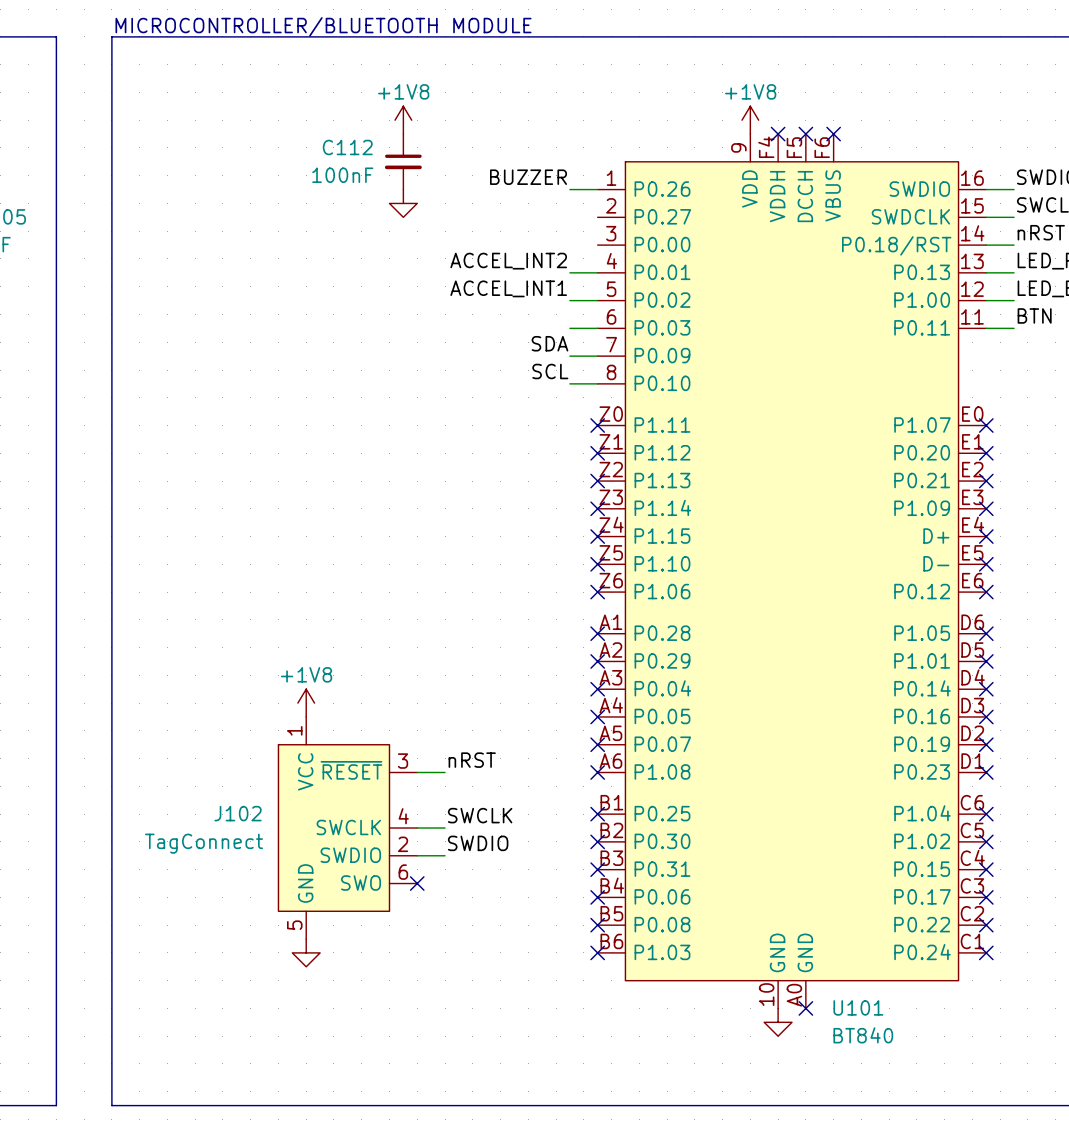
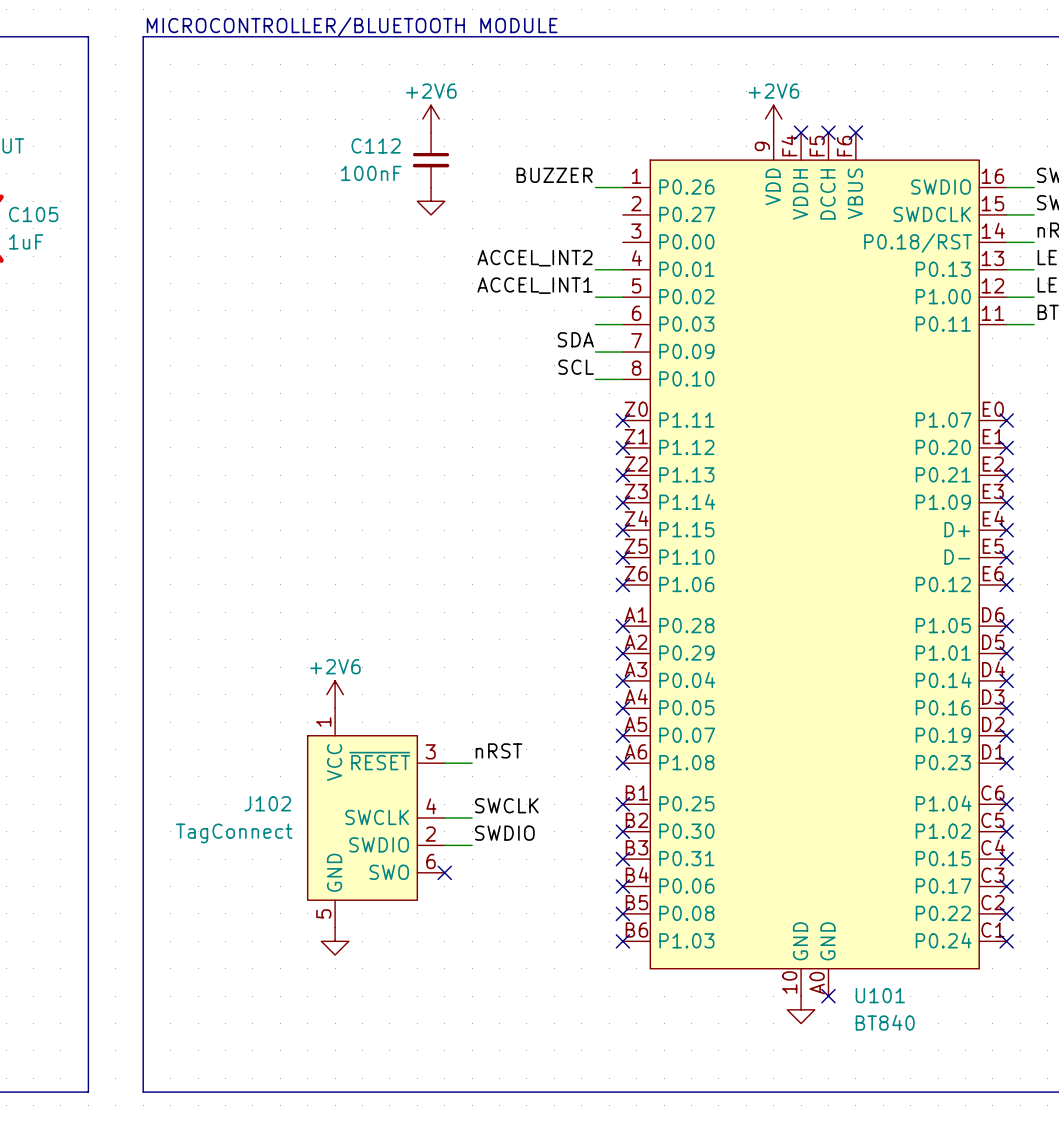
power symbol: +1V8 (403, 120) -> +2V6 (431, 119)
power symbol: +1V8 (750, 120) -> +2V6 (773, 119)
power symbol: +1V8 (306, 703) -> +2V6 (335, 694)

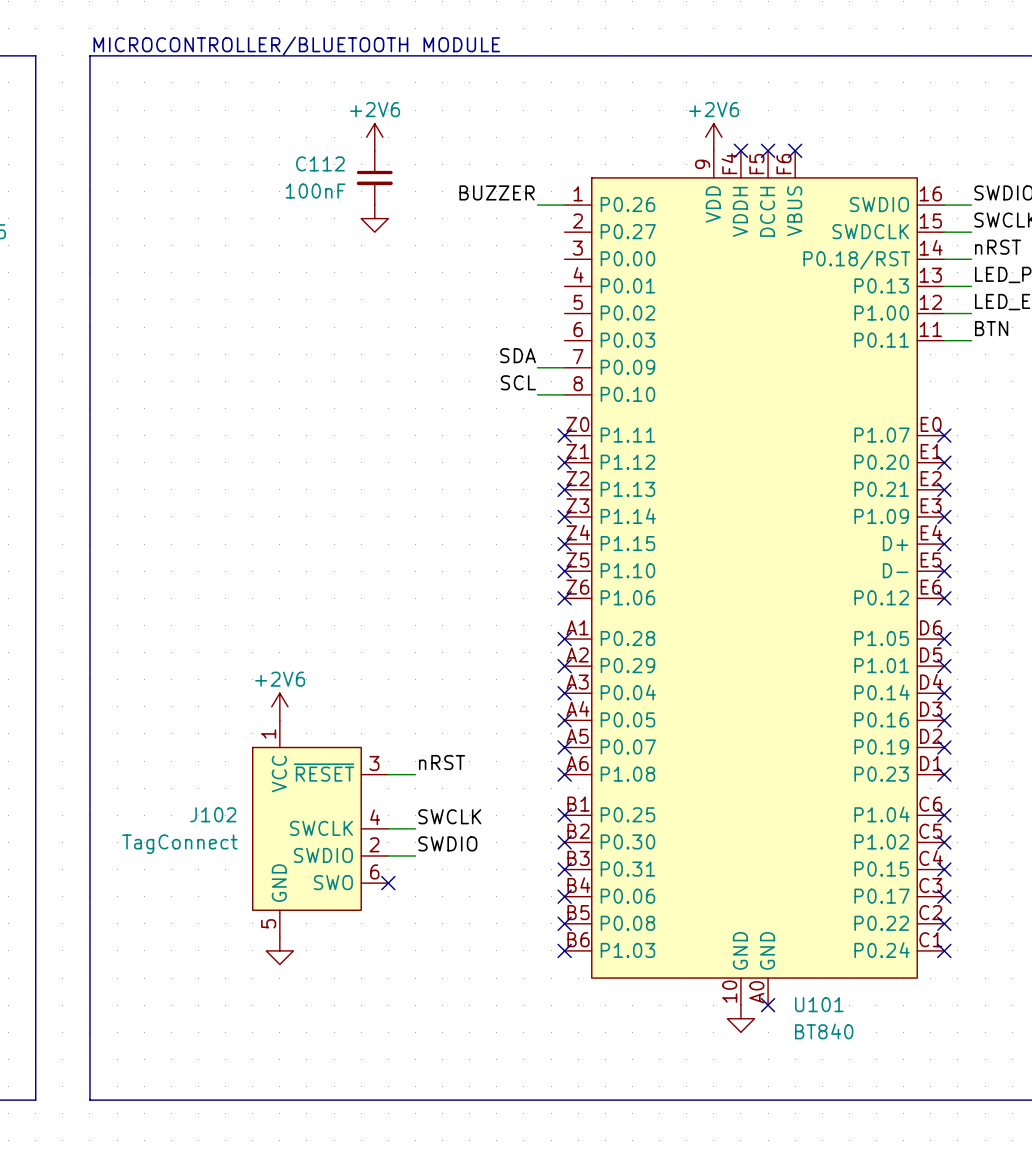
label: ACCEL_INT2 (535, 258) -> none
wire: (595, 269) (622, 269) -> none
label: ACCEL_INT1 (535, 285) -> none
wire: (595, 297) (622, 297) -> none
wire: (595, 324) (622, 324) -> none

